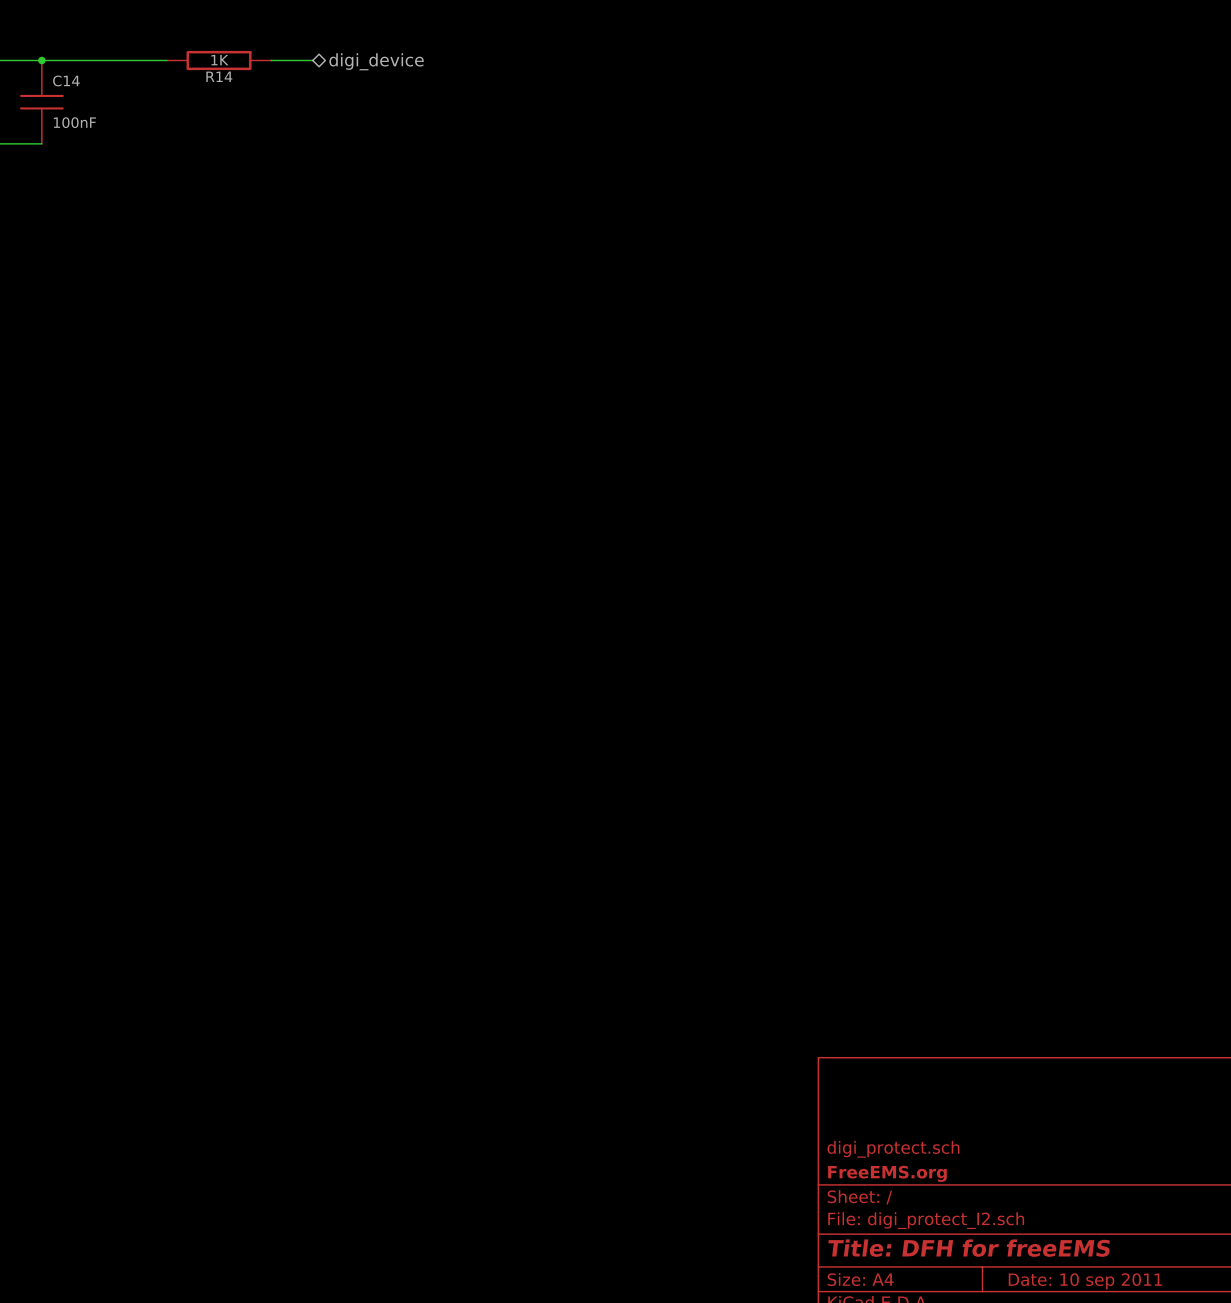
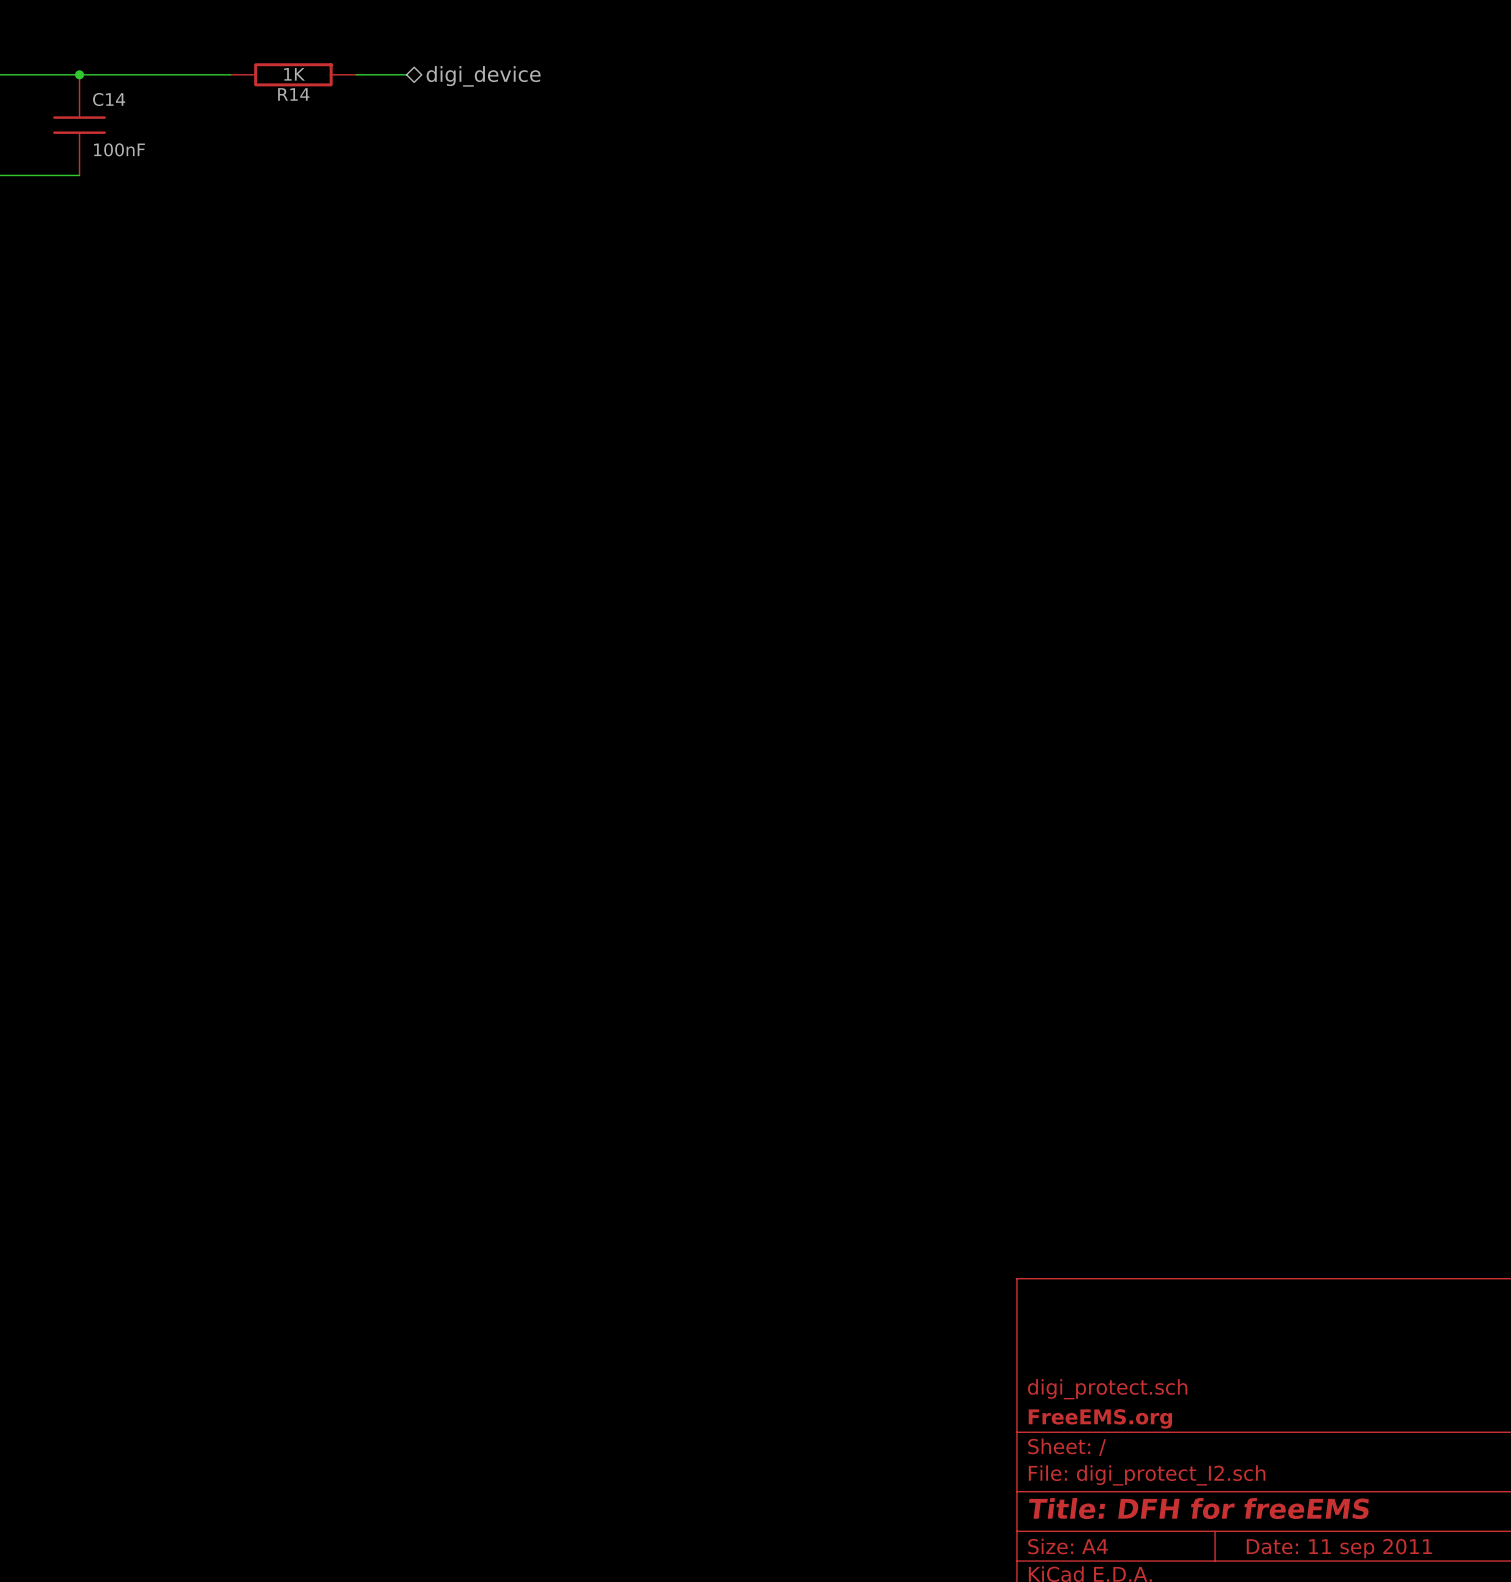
title block: Date: 10 sep 2011 (1085, 1281) -> Date: 11 sep 2011 (1339, 1548)

